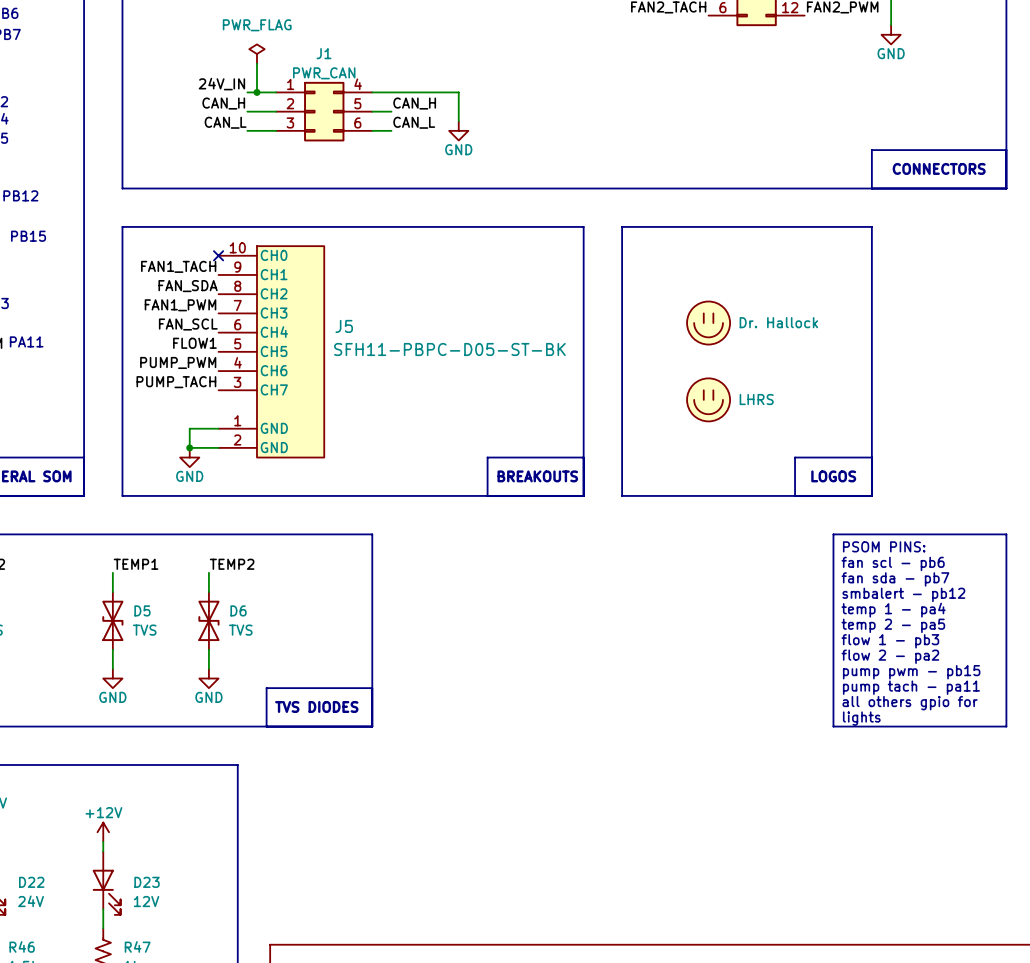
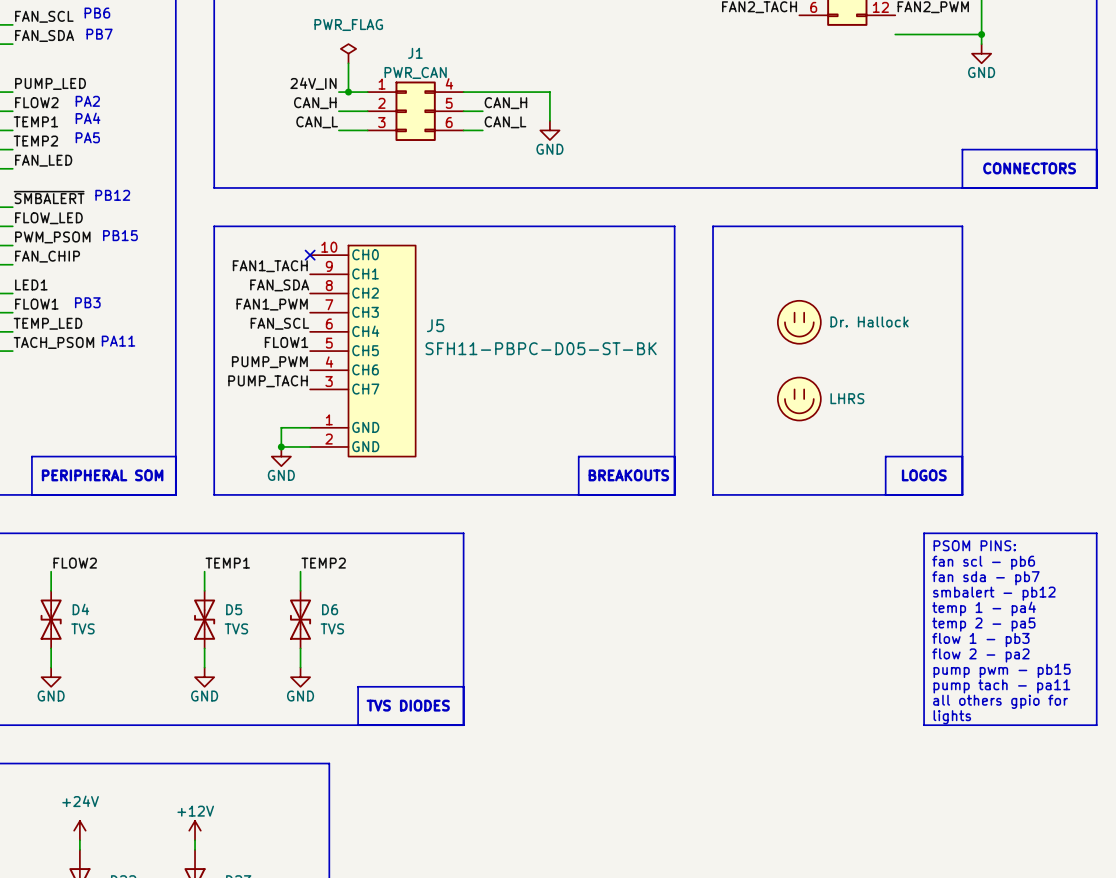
wire: none -> (895, 34) (981, 34)
power symbol position: GND (891, 34) -> GND (981, 53)
junction: none -> (981, 34)

